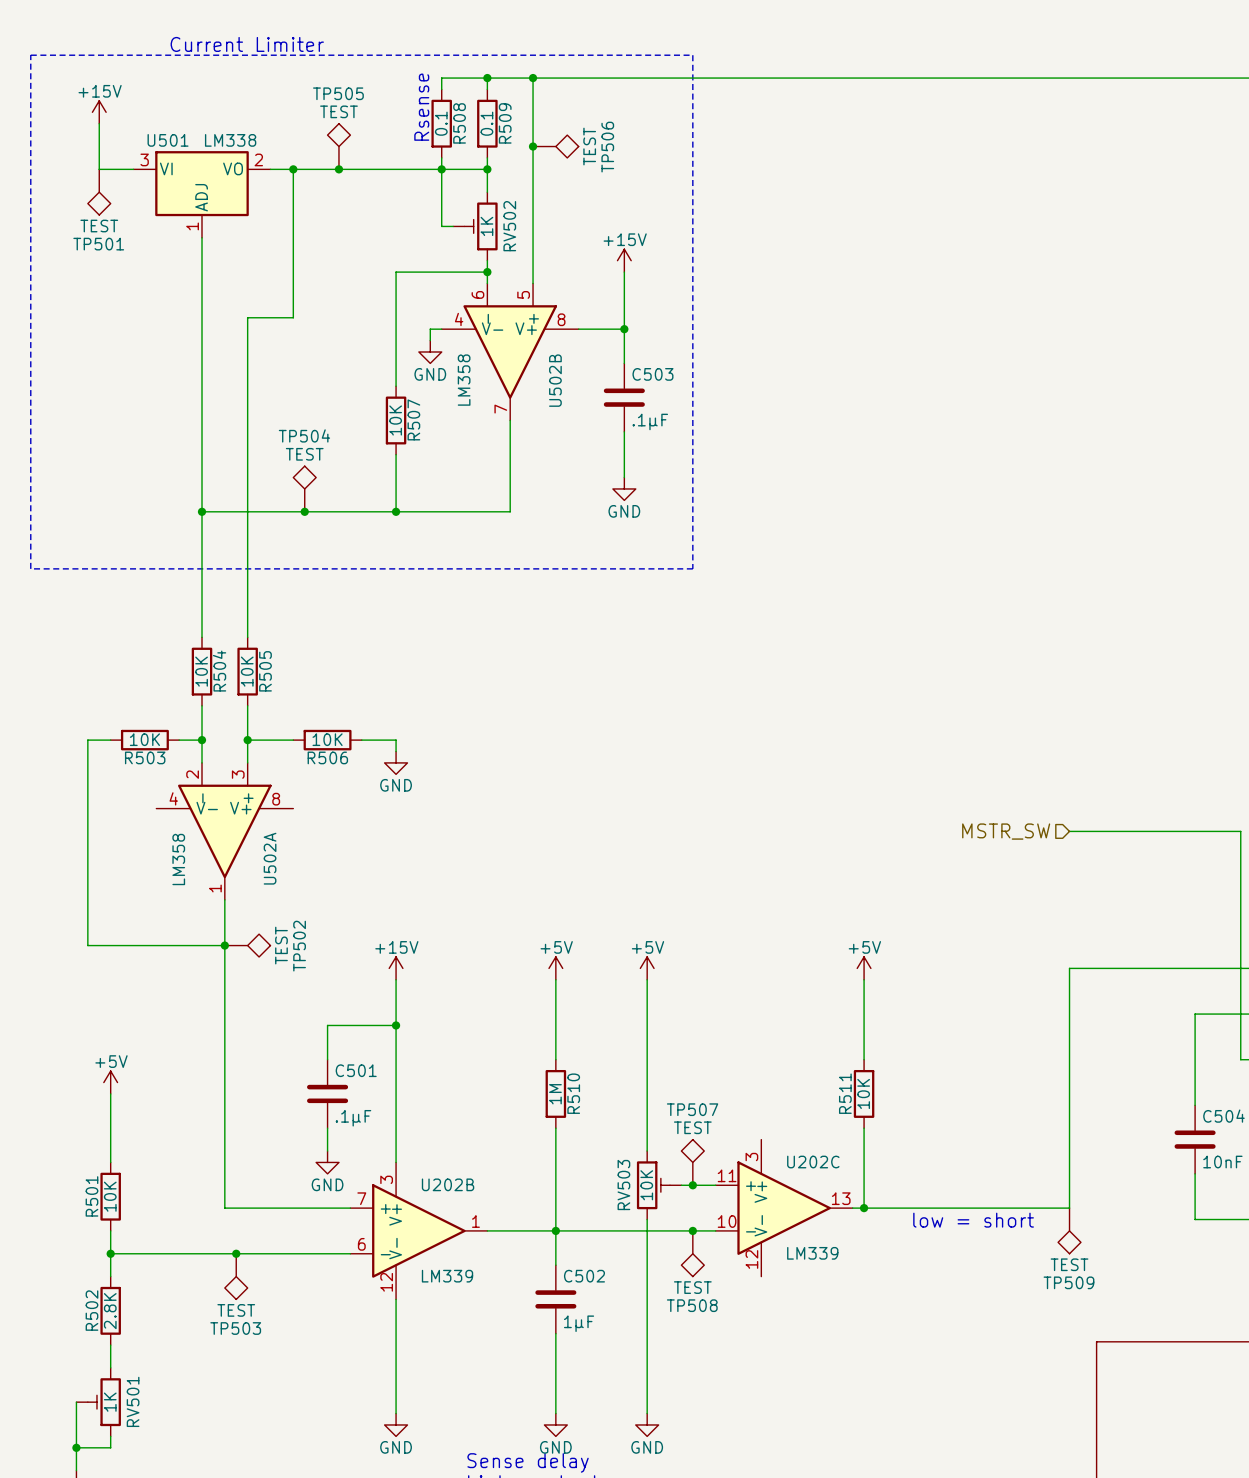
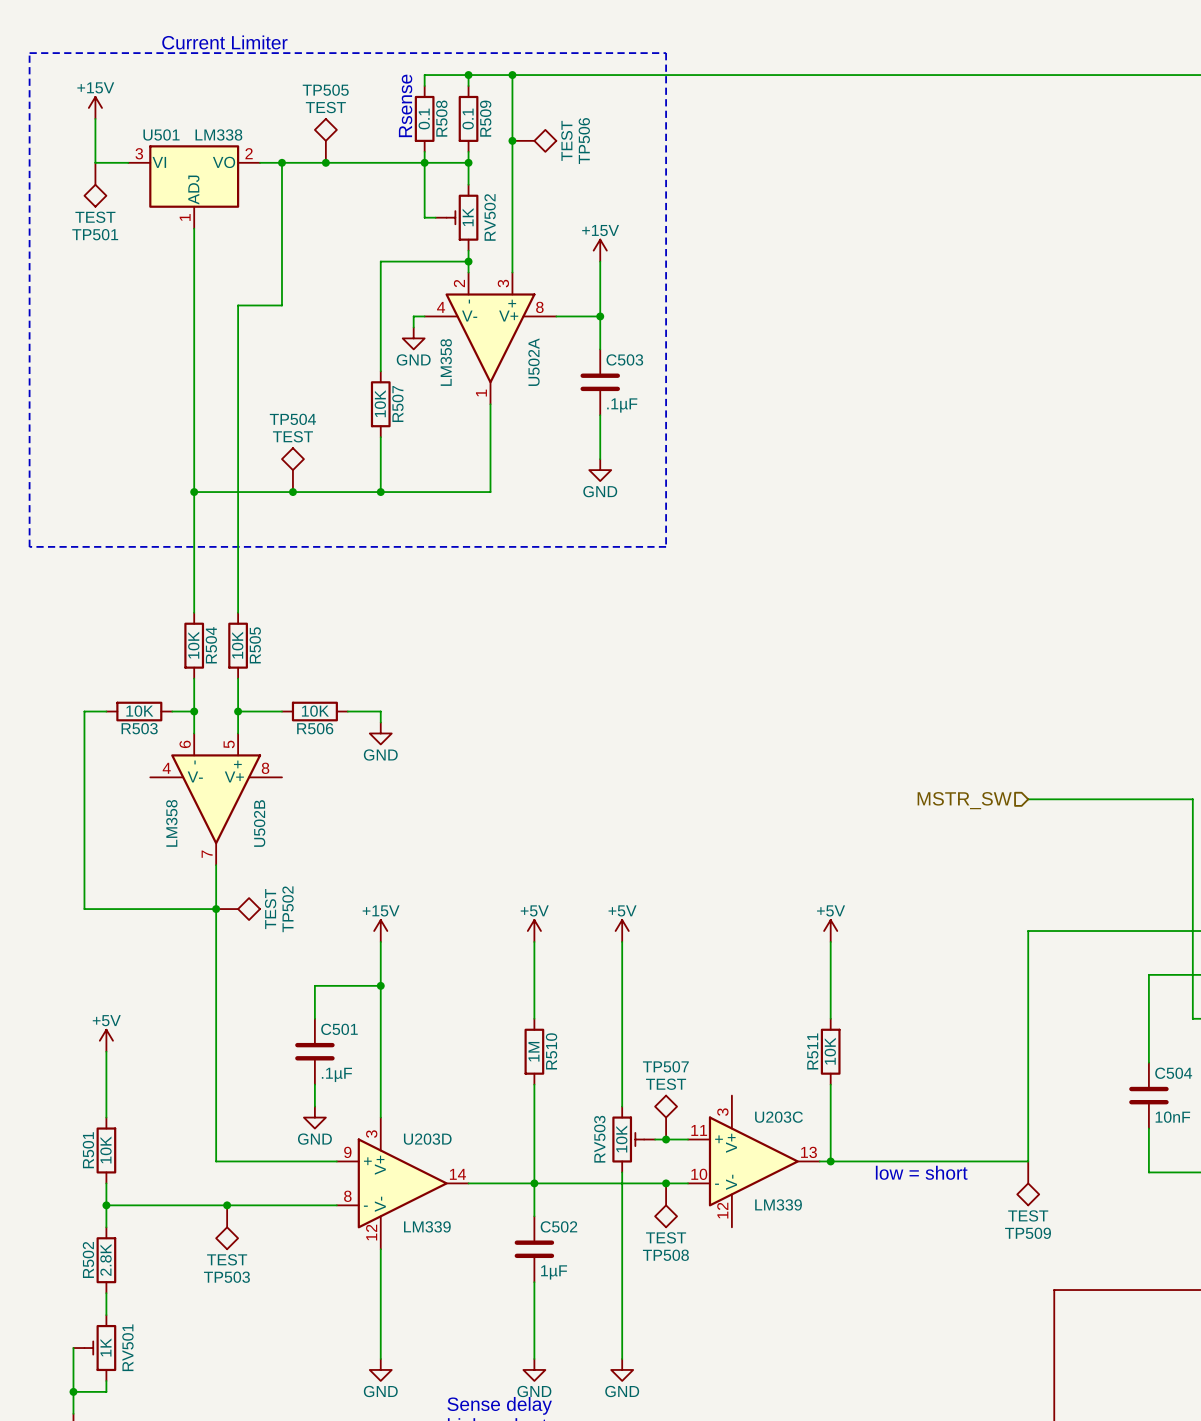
U502B position: (510, 352) -> (216, 799)
U502A position: (224, 831) -> (490, 338)
U202C name: U202C (813, 1162) -> U203C (779, 1117)
U202B name: U202B (448, 1184) -> U203D (427, 1139)
U202B pin number: 7 (361, 1198) -> 9 (347, 1152)
U202B pin number: 1 (475, 1221) -> 14 (457, 1174)
U202B pin number: 6 (361, 1244) -> 8 (347, 1196)

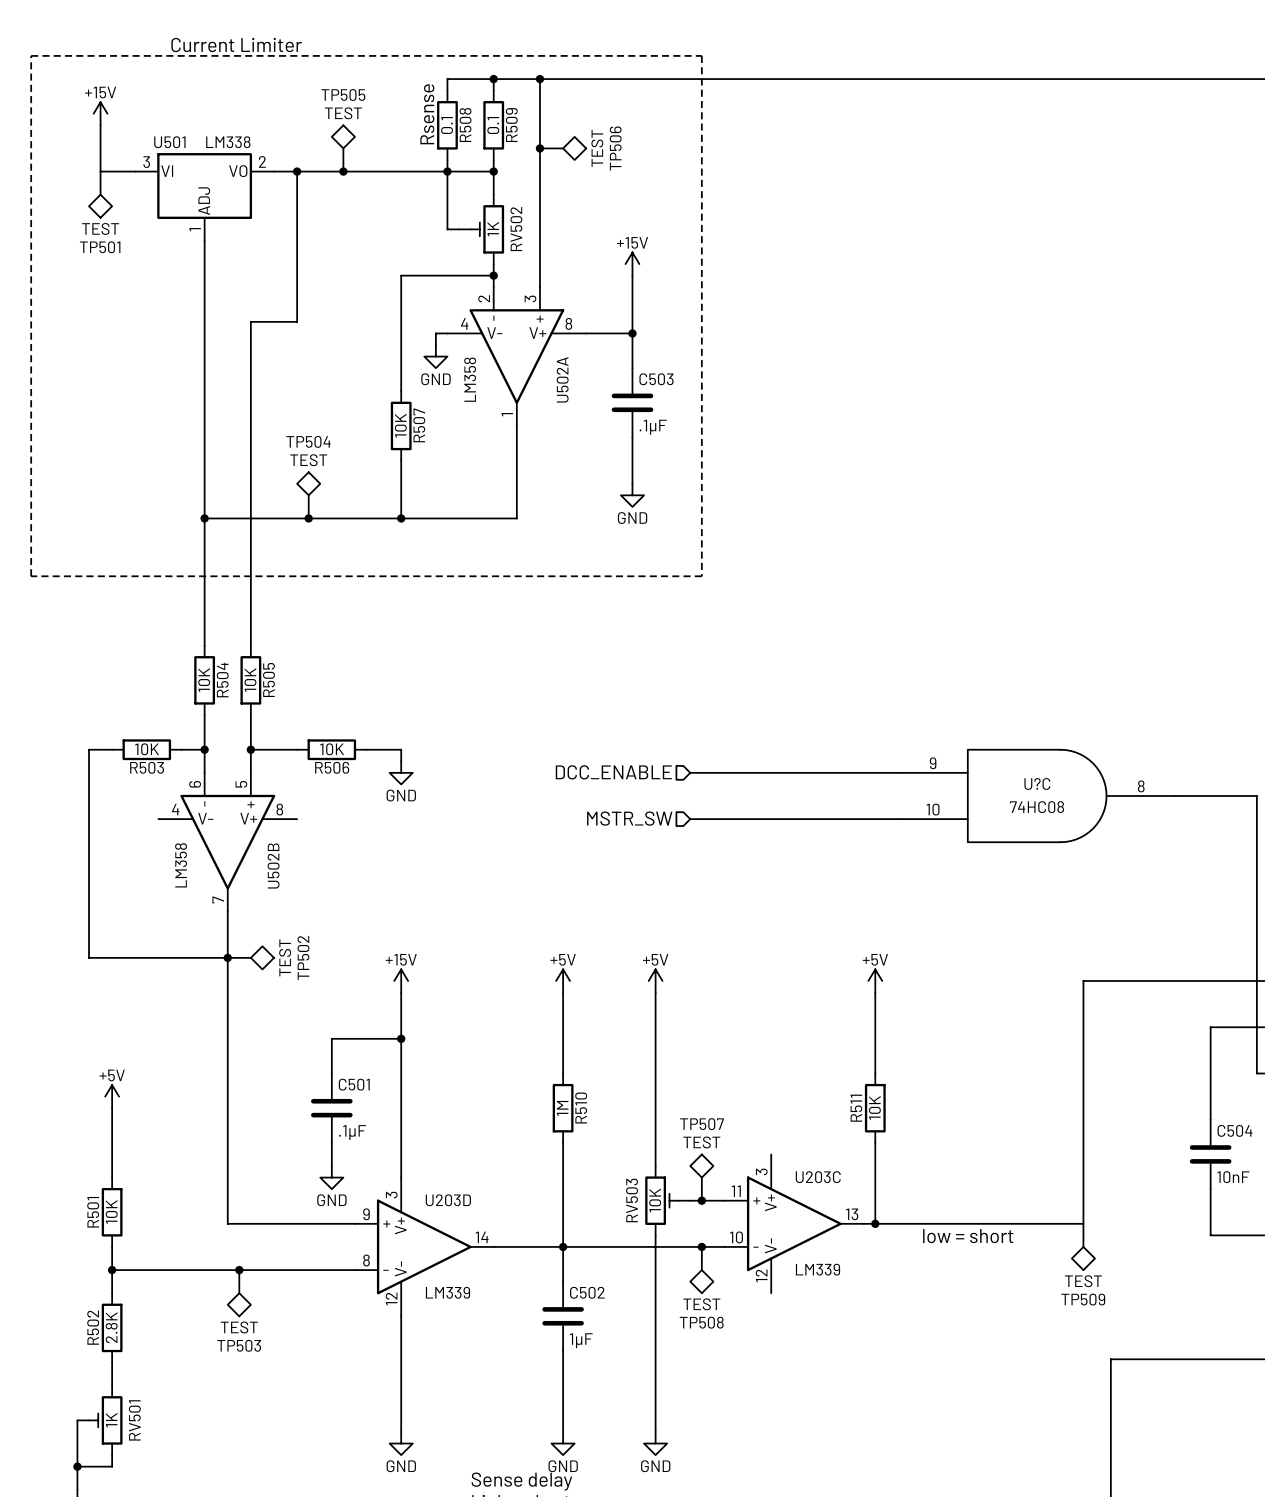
wire: none -> (690, 772) (898, 772)
hierarchical label: none -> DCC_ENABLE (613, 772)
U?C: none -> 74HC08 (1037, 795)
wire: none -> (690, 819) (898, 819)
hierarchical label: none -> MSTR_SW (629, 818)
wire: (1028, 799) (1192, 799) -> (1175, 795) (1256, 795) (1256, 842)
hierarchical label: MSTR_SW (964, 800) -> none

